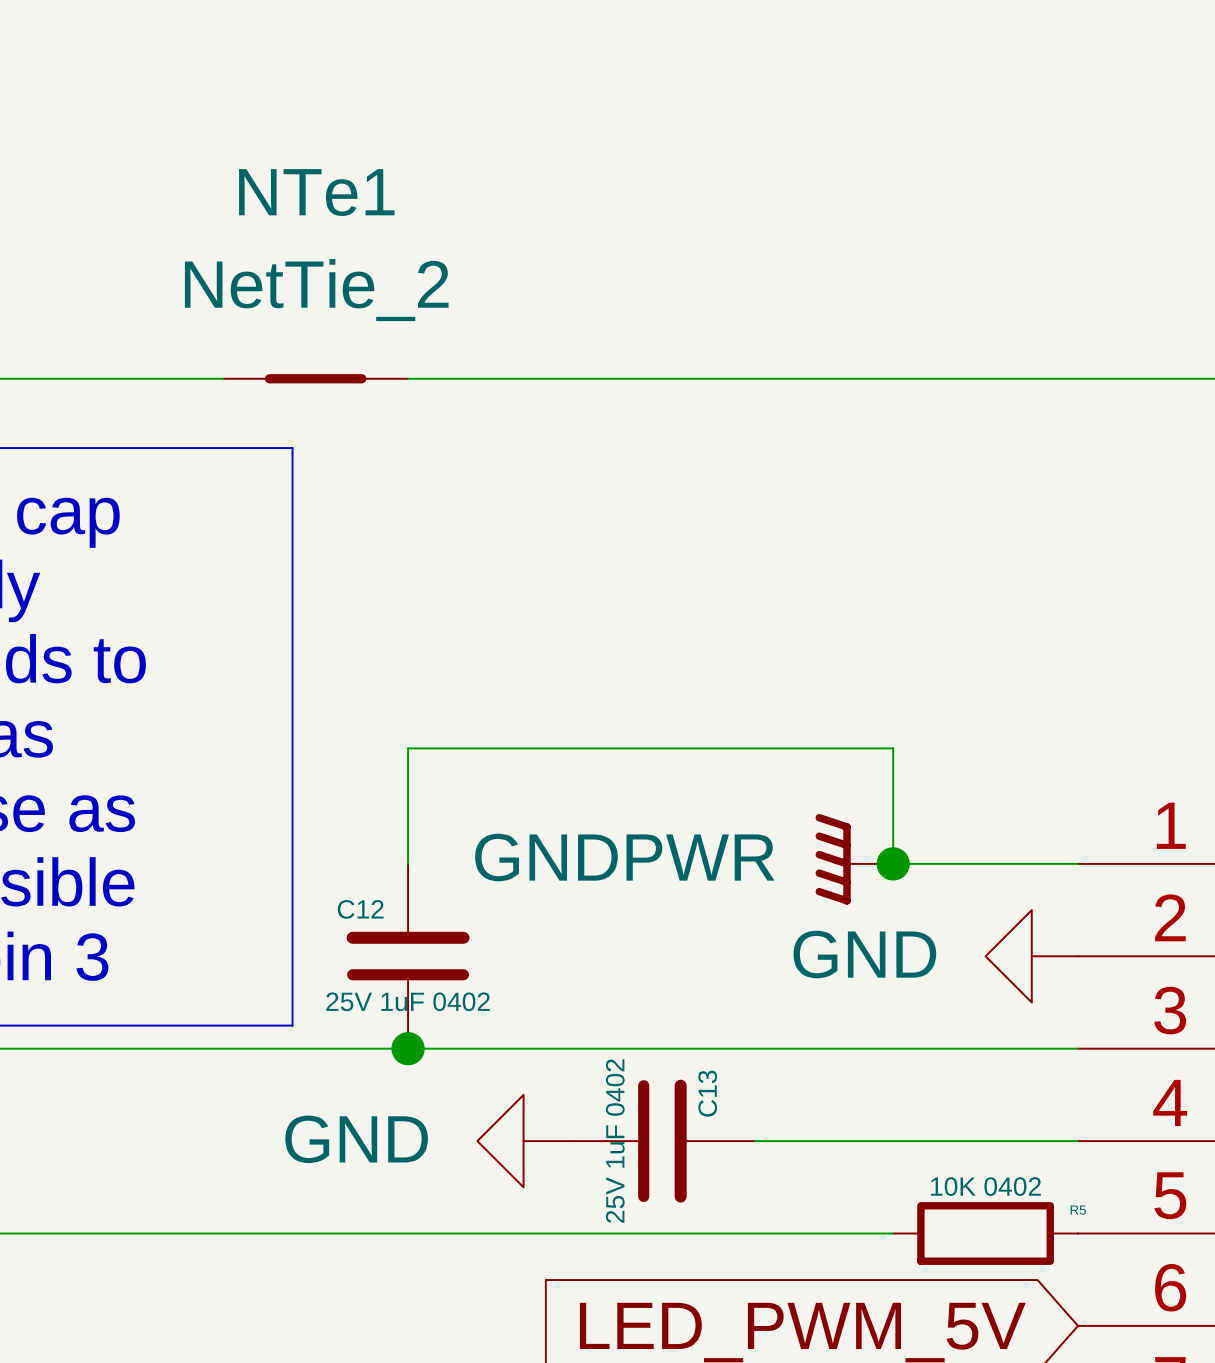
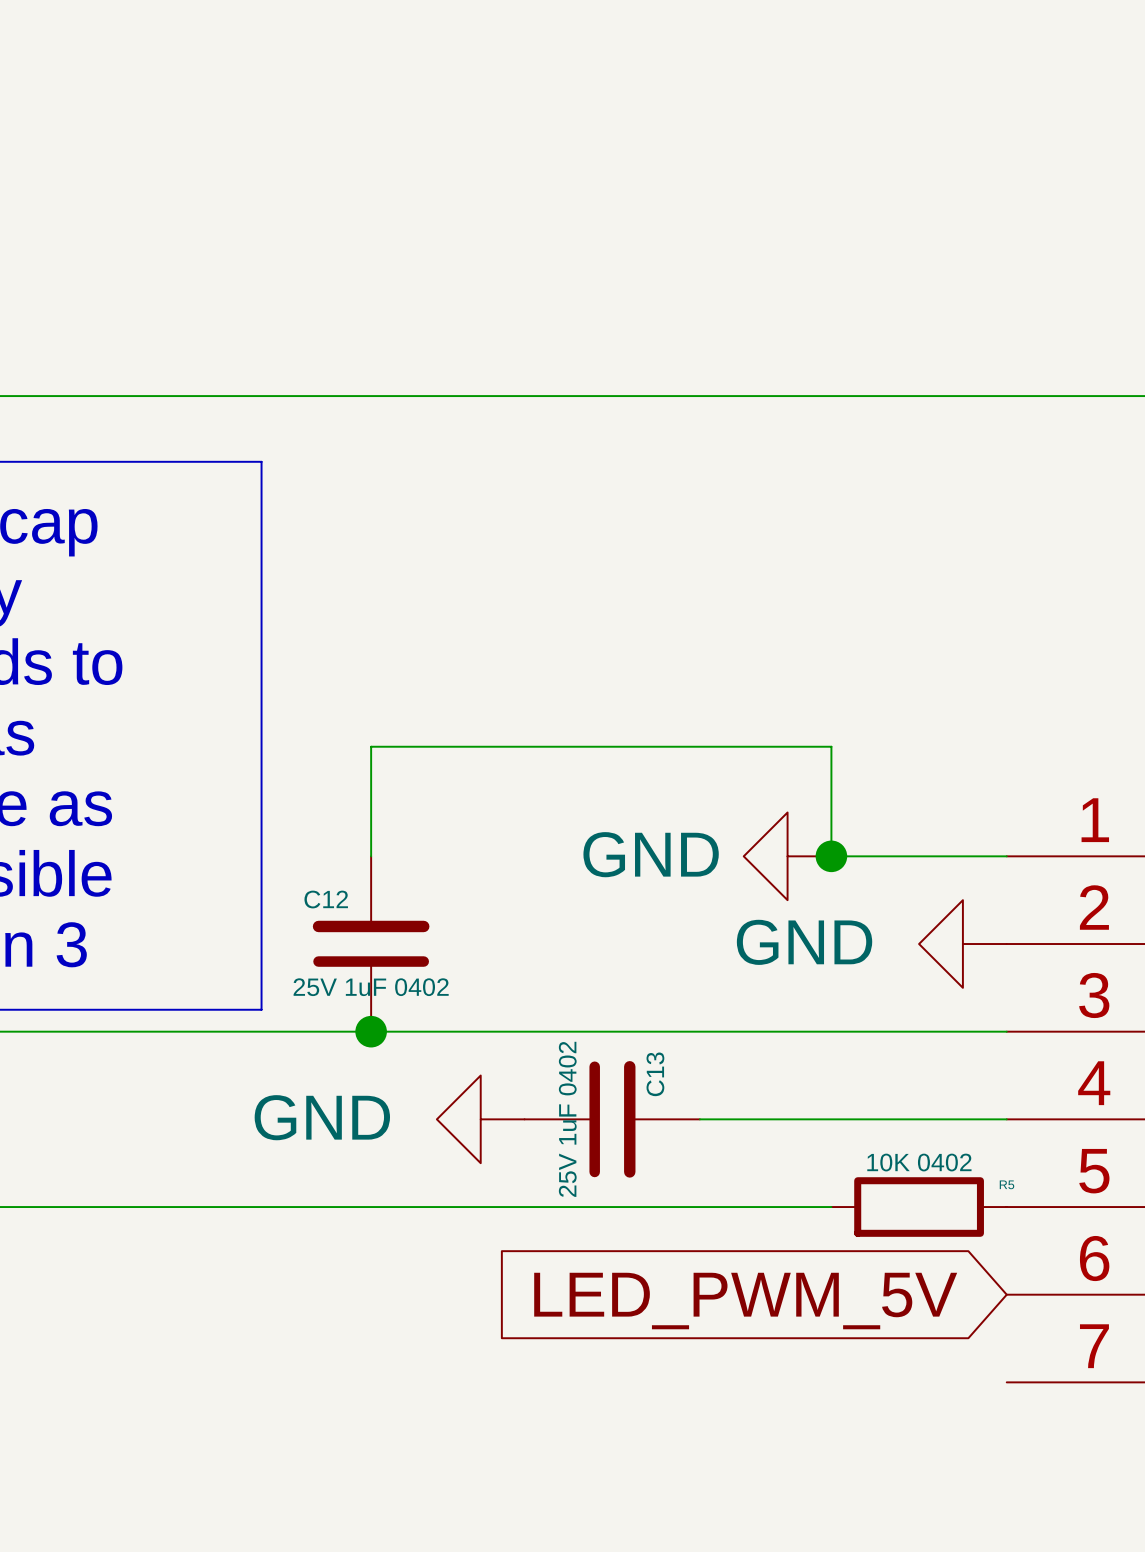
NTe1: NetTie_2 (315, 378) -> none
power symbol: GNDPWR (854, 859) -> GND (787, 856)

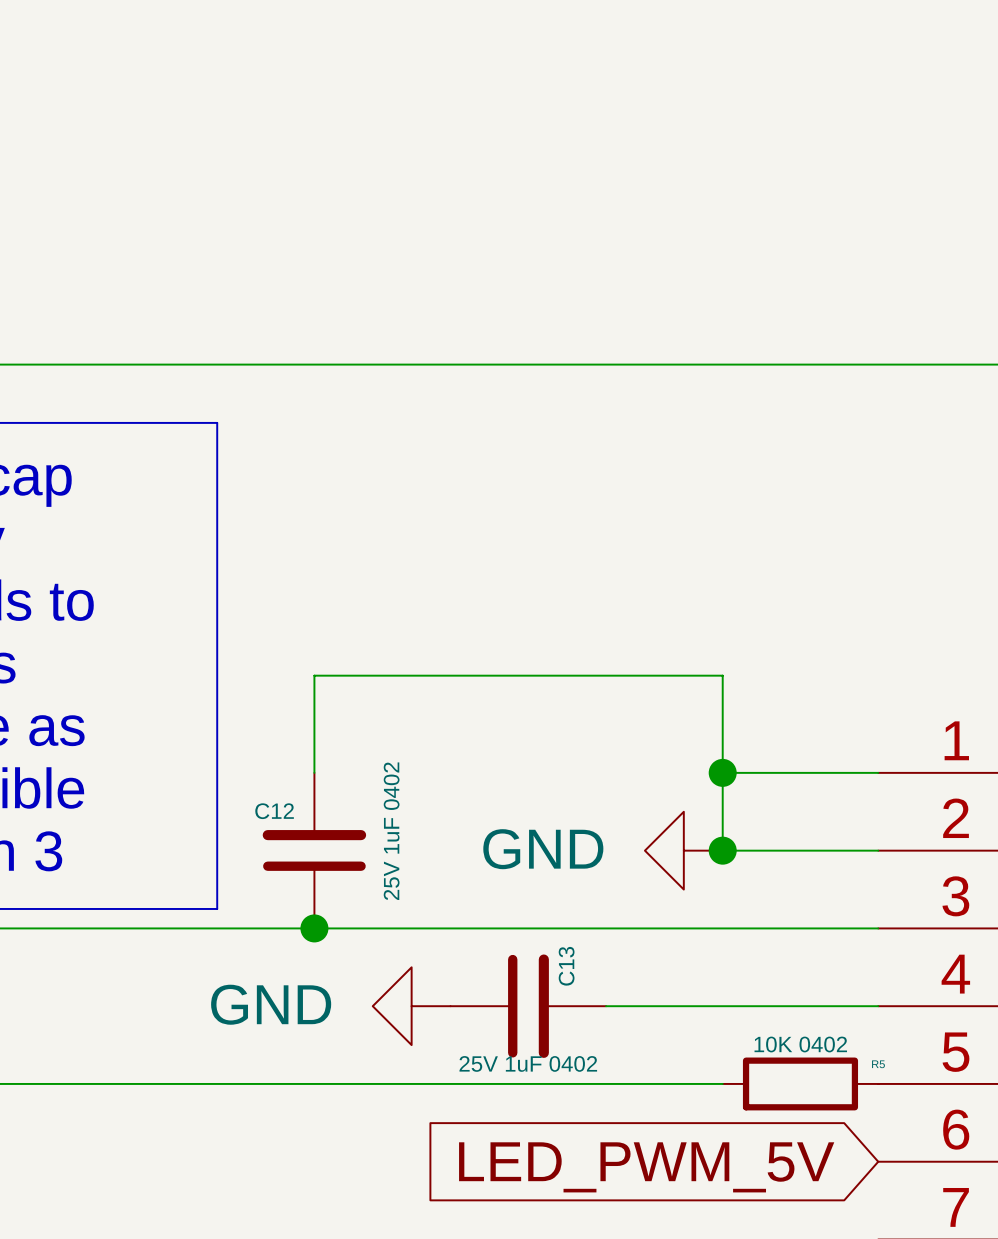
power symbol: GND (787, 856) -> none
wire: none -> (722, 772) (722, 850) (878, 850)
power symbol: none -> GND (683, 850)
junction: none -> (722, 850)
power symbol: GND (962, 944) -> none
C12 value rotation: 0° (371, 987) -> 90° counterclockwise (391, 831)
C13 value rotation: 0° (567, 1119) -> 90° clockwise (528, 1063)

